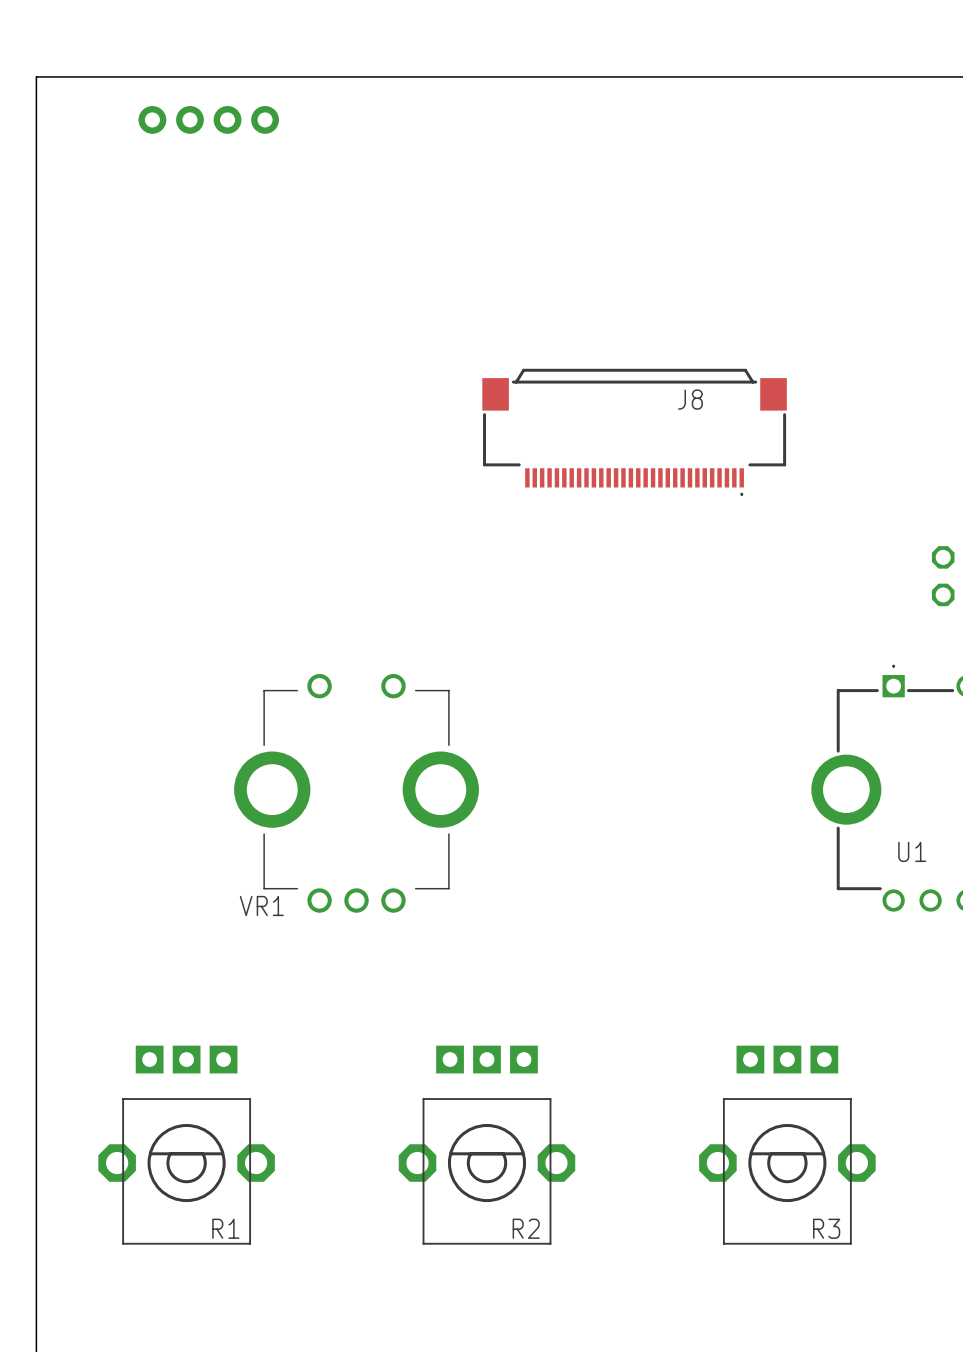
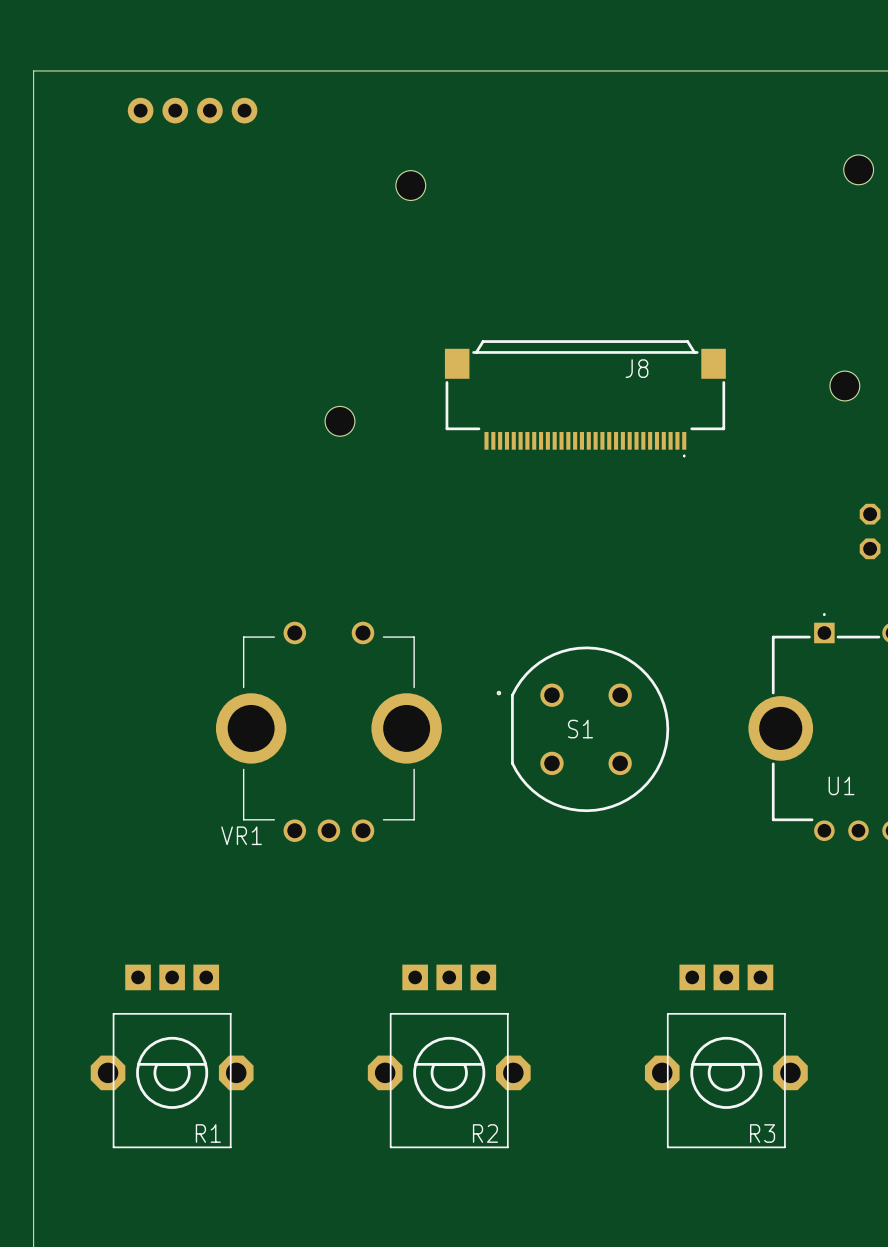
hole: none -> (858, 169)
hole: none -> (410, 185)
hole: none -> (844, 386)
hole: none -> (340, 421)
S1: none -> (582, 729)

